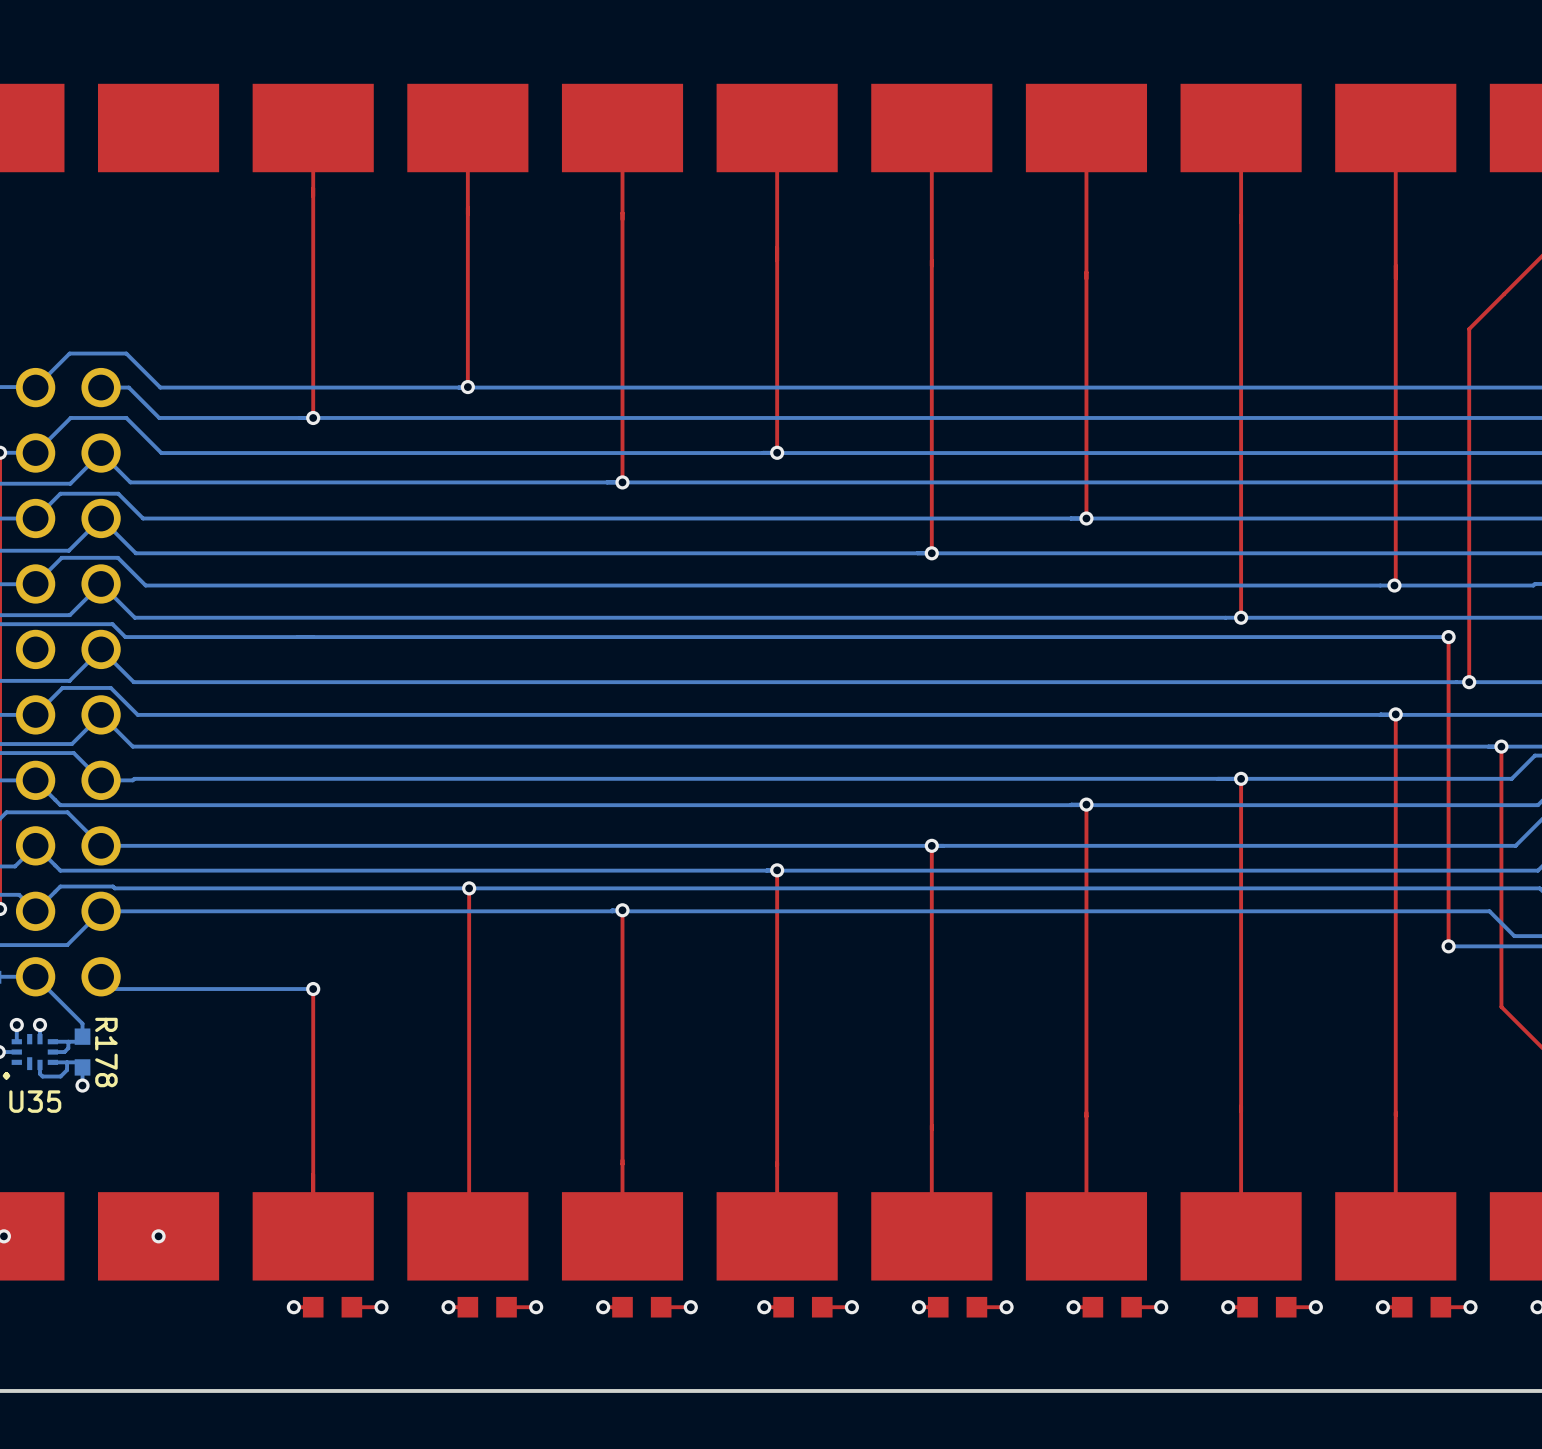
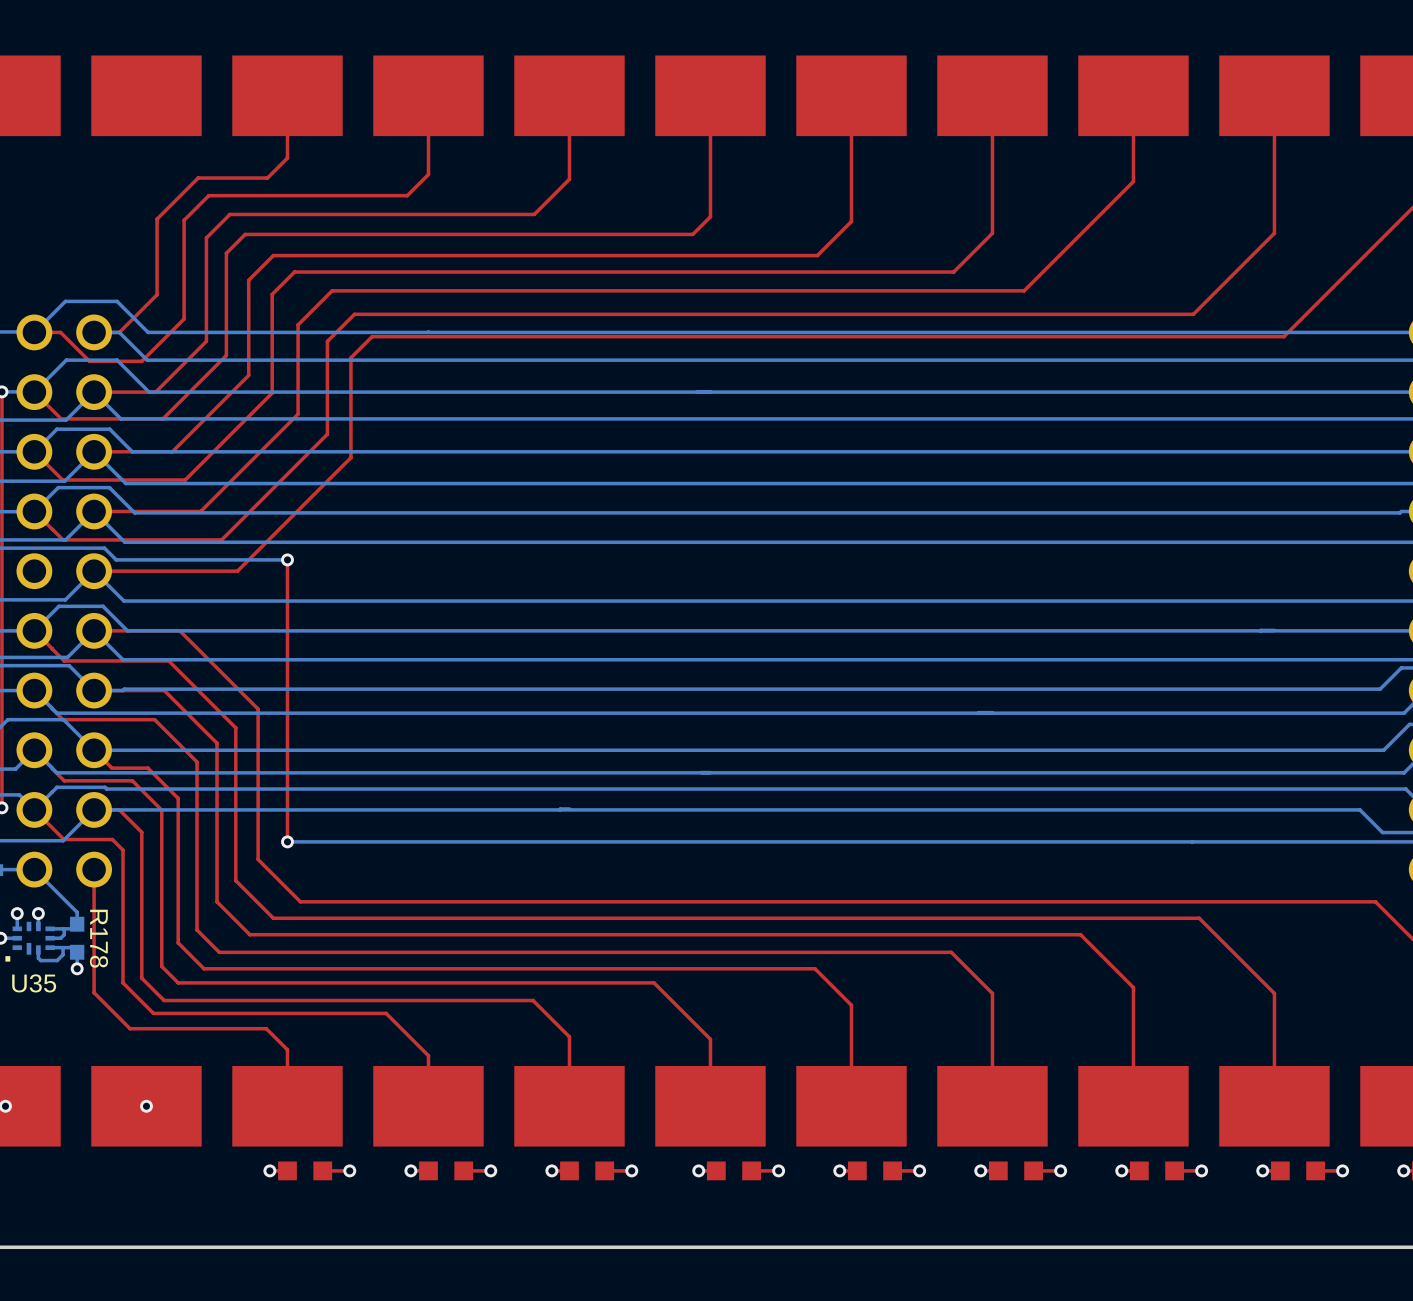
top track: (313, 196) (313, 417) -> (287, 158) (267, 178) (198, 178) (157, 219) (157, 294) (119, 332) (94, 332)
top track: (467, 214) (467, 387) -> (428, 174) (407, 195) (208, 195) (184, 220) (184, 319) (141, 361) (89, 361) (60, 332) (34, 332)
top track: (622, 219) (622, 482) -> (569, 179) (534, 214) (229, 214) (206, 237) (206, 341) (155, 392) (94, 392)
top track: (1241, 222) (1241, 617) -> (1133, 181) (1024, 290) (332, 290) (298, 324) (298, 414) (200, 511) (94, 511)
top track: (777, 260) (777, 452) -> (710, 216) (692, 234) (245, 234) (226, 253) (226, 355) (162, 418) (61, 418) (34, 392)
top track: (931, 265) (931, 553) -> (851, 221) (817, 255) (273, 255) (248, 280) (248, 375) (172, 451) (94, 451)
top track: (1086, 278) (1086, 518) -> (992, 233) (953, 272) (294, 272) (272, 294) (272, 393) (185, 480) (62, 480) (34, 451)
top track: (1395, 278) (1394, 585) -> (1274, 233) (1193, 314) (354, 314) (327, 341) (327, 434) (221, 539) (63, 539) (34, 511)
top track: (1469, 329) (1469, 682) -> (1341, 279) (1283, 336) (372, 336) (350, 357) (350, 457) (237, 571) (94, 571)
via: (467, 387) -> none
via: (313, 417) -> none
via: (777, 452) -> none
via: (622, 482) -> none
via: (1086, 518) -> none
via: (931, 553) -> none
via: (1394, 585) -> none
via: (1241, 617) -> none
top track: none -> (287, 559) (287, 841)
via: none -> (287, 559)
bottom track: (1448, 637) (313, 637) -> (1322, 841) (287, 841)
top track: (1448, 637) (1448, 946) -> none
via: (1448, 637) -> none
via: (1469, 682) -> none
top track: (1395, 714) (1395, 1112) -> (34, 630) (64, 660) (168, 660) (235, 727) (235, 880) (273, 918) (1199, 918) (1274, 993)
via: (1395, 714) -> none
top track: (1501, 746) (1501, 1006) (1506, 1012) -> (94, 630) (179, 630) (258, 709) (258, 859) (300, 901) (1375, 901)
via: (1501, 746) -> none
top track: (1241, 778) (1241, 1106) -> (94, 690) (164, 690) (216, 743) (216, 901) (249, 934) (1080, 934) (1133, 987)
via: (1241, 778) -> none
top track: (1086, 804) (1086, 1112) -> (52, 708) (63, 719) (154, 719) (197, 762) (197, 930) (219, 952) (951, 952) (992, 993)
via: (1086, 804) -> none
top track: (931, 845) (931, 1125) -> (94, 750) (112, 768) (147, 768) (178, 798) (178, 942) (204, 968) (815, 968) (851, 1005)
via: (931, 845) -> none
top track: (777, 870) (777, 1162) -> (34, 750) (64, 780) (132, 780) (161, 810) (161, 966) (178, 982) (654, 982) (710, 1039)
via: (777, 870) -> none
top track: (469, 888) (467, 1236) -> (34, 809) (64, 839) (112, 839) (122, 850) (122, 982) (153, 1013) (386, 1013) (428, 1055) (428, 1106)
via: (469, 888) -> none
top track: (622, 910) (622, 1160) -> (94, 809) (119, 809) (141, 832) (141, 978) (164, 1000) (533, 1000) (569, 1036)
via: (622, 910) -> none
via: (1448, 946) -> none
bottom track: (101, 976) (113, 989) (313, 989) -> none
top track: (313, 989) (313, 1174) -> (94, 869) (94, 992) (130, 1028) (266, 1028) (287, 1049)
via position: (313, 989) -> (287, 841)

